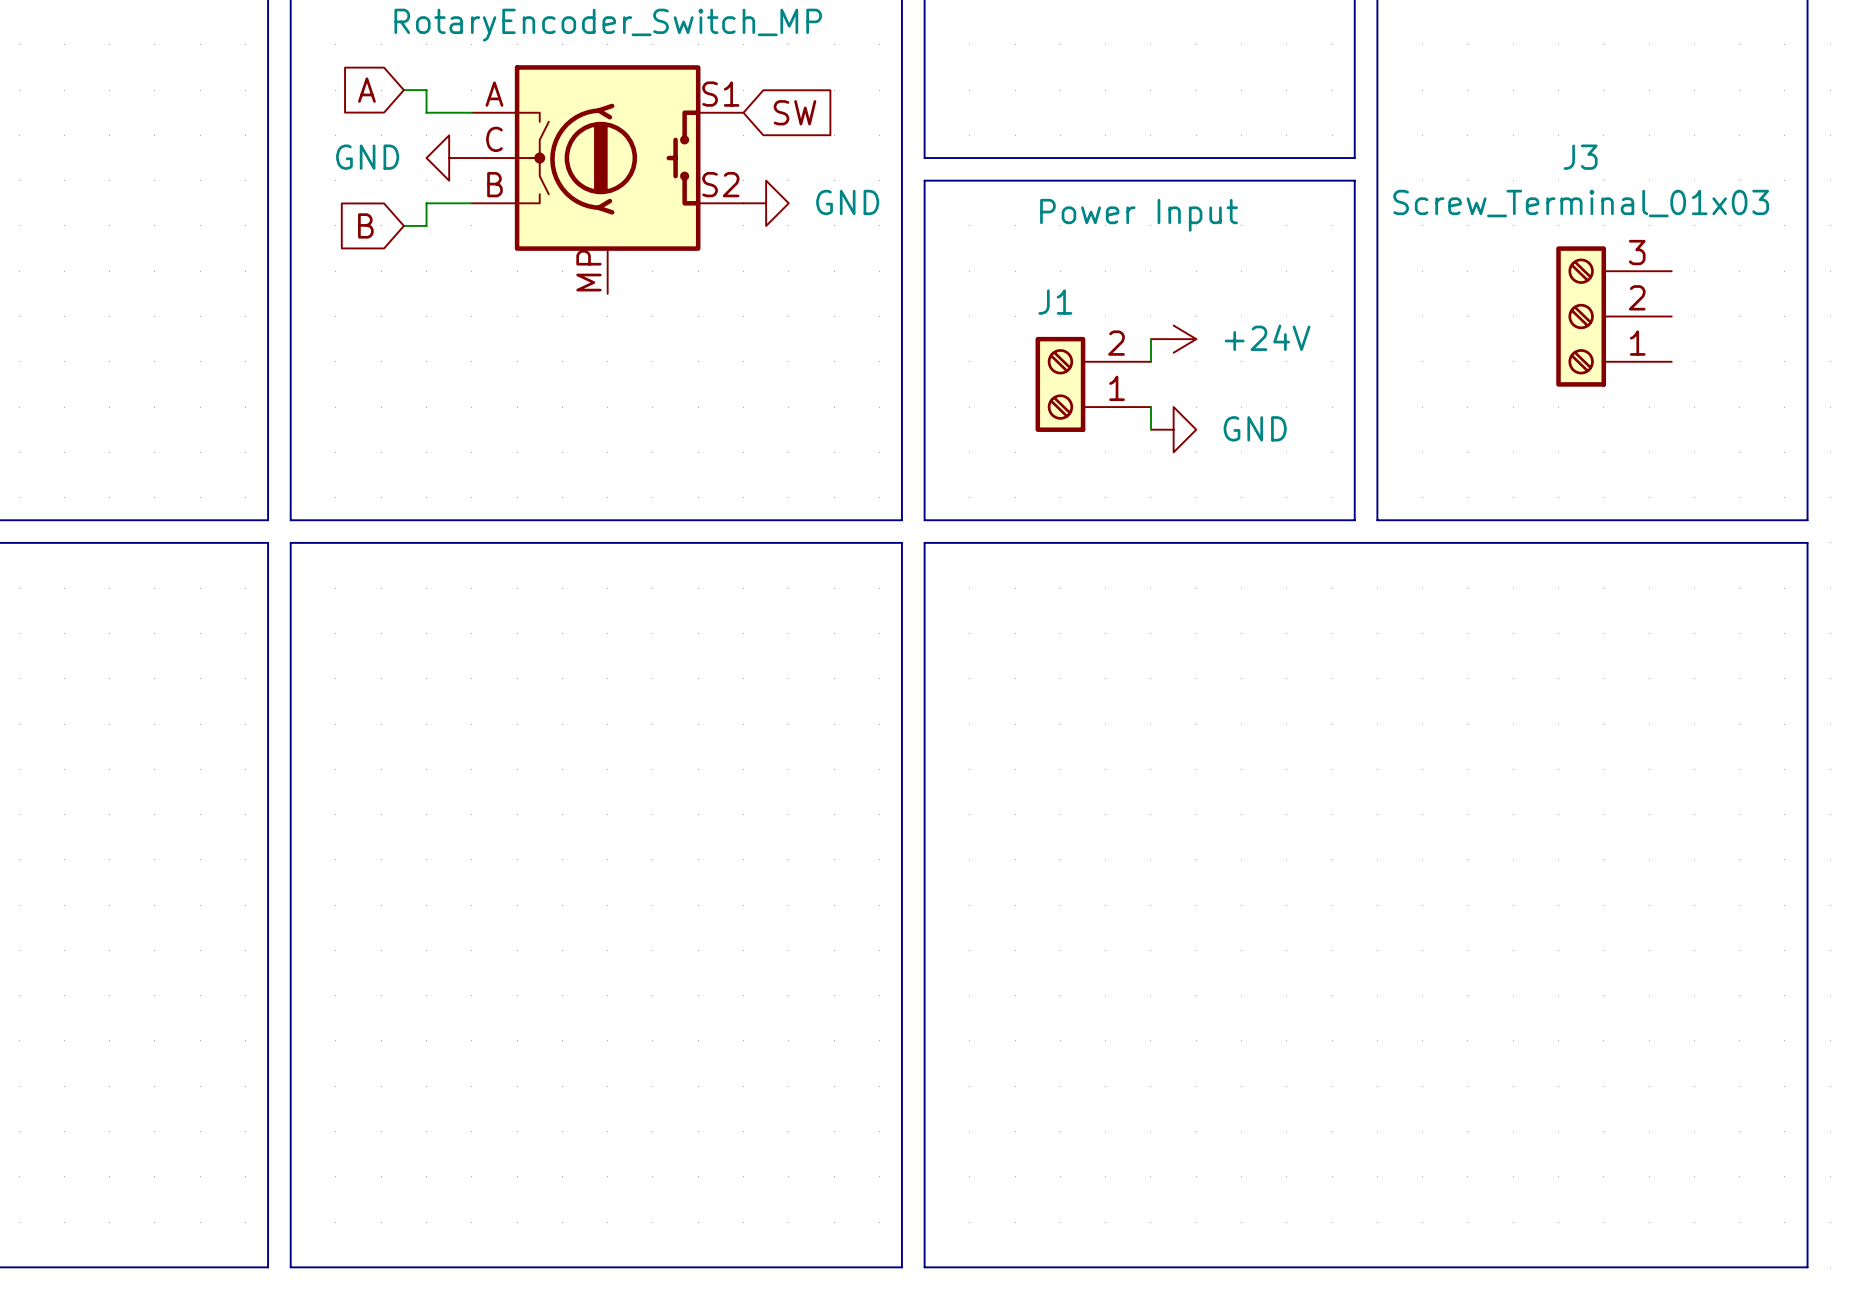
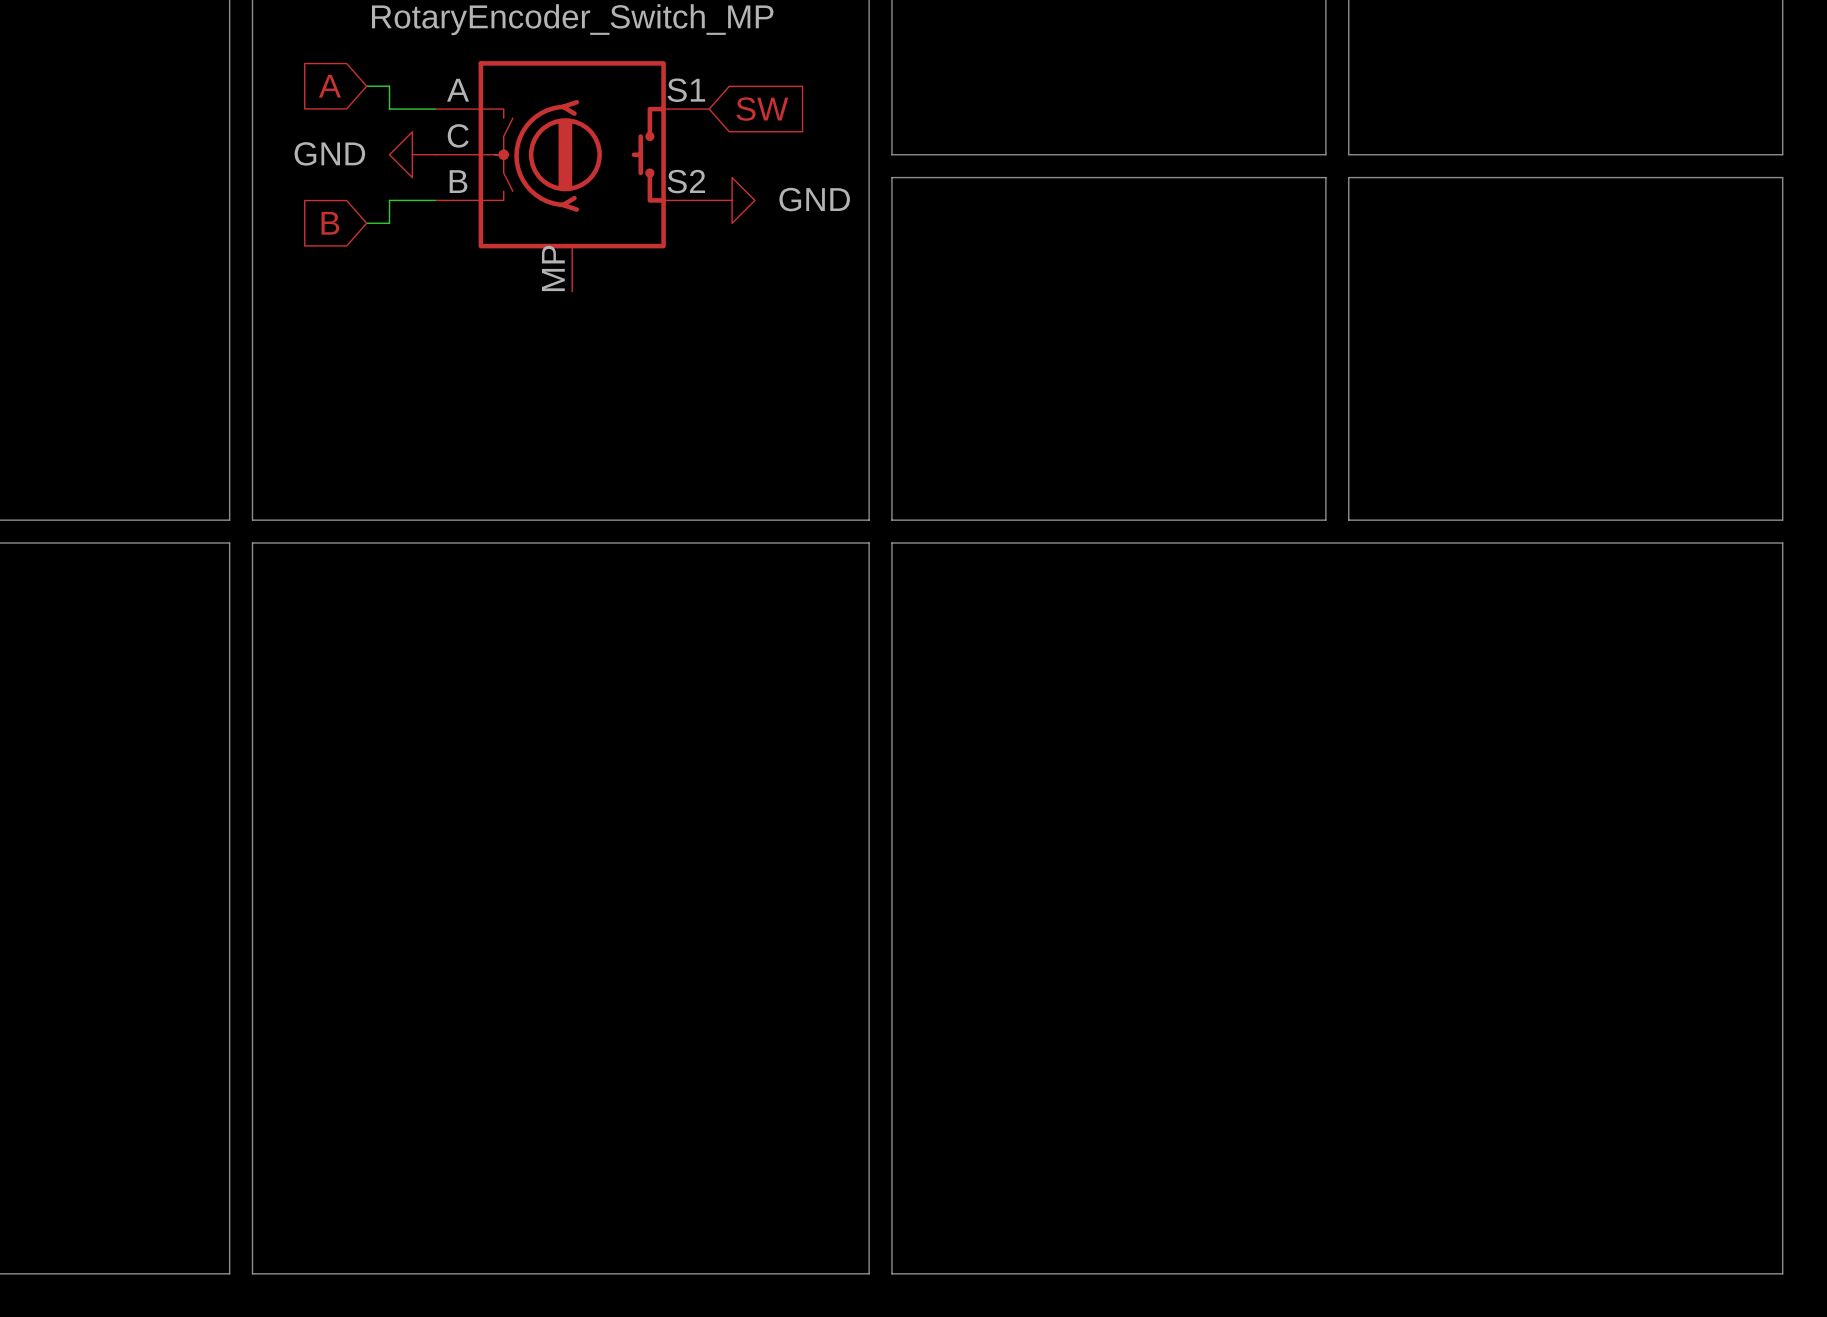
line: (1377, 158) (1377, 180) -> (1348, 154) (1782, 154)
line: (1807, 158) (1807, 180) -> (1348, 177) (1782, 177)
J3: Screw_Terminal_01x03 (1613, 316) -> none
wire: (1150, 339) (1150, 361) -> none
power symbol: +24V (1173, 339) -> none
J1: Power Input (1093, 384) -> none
wire: (1150, 407) (1150, 429) -> none
power symbol: GND (1173, 429) -> none

